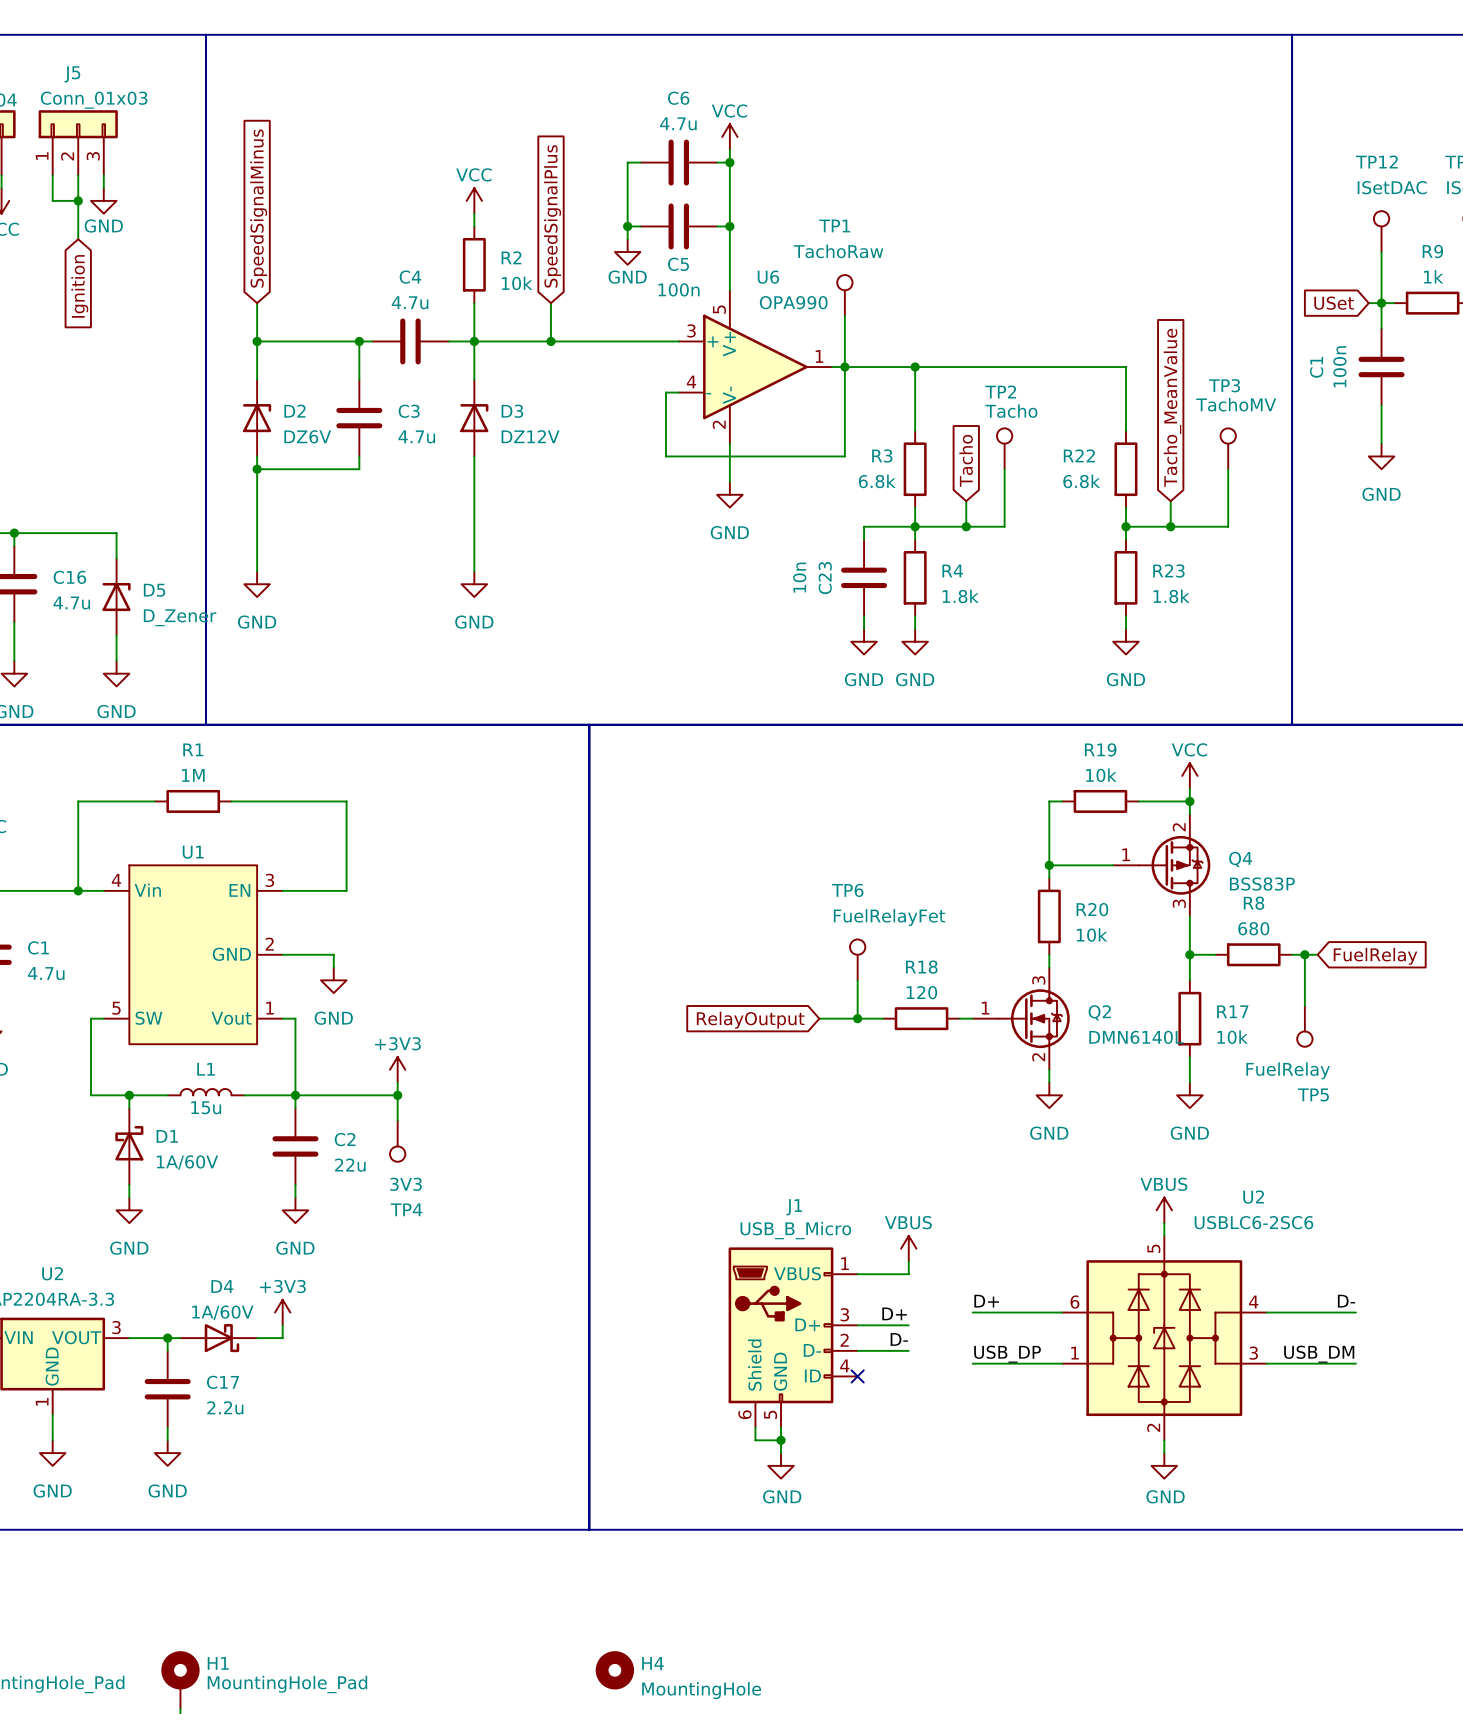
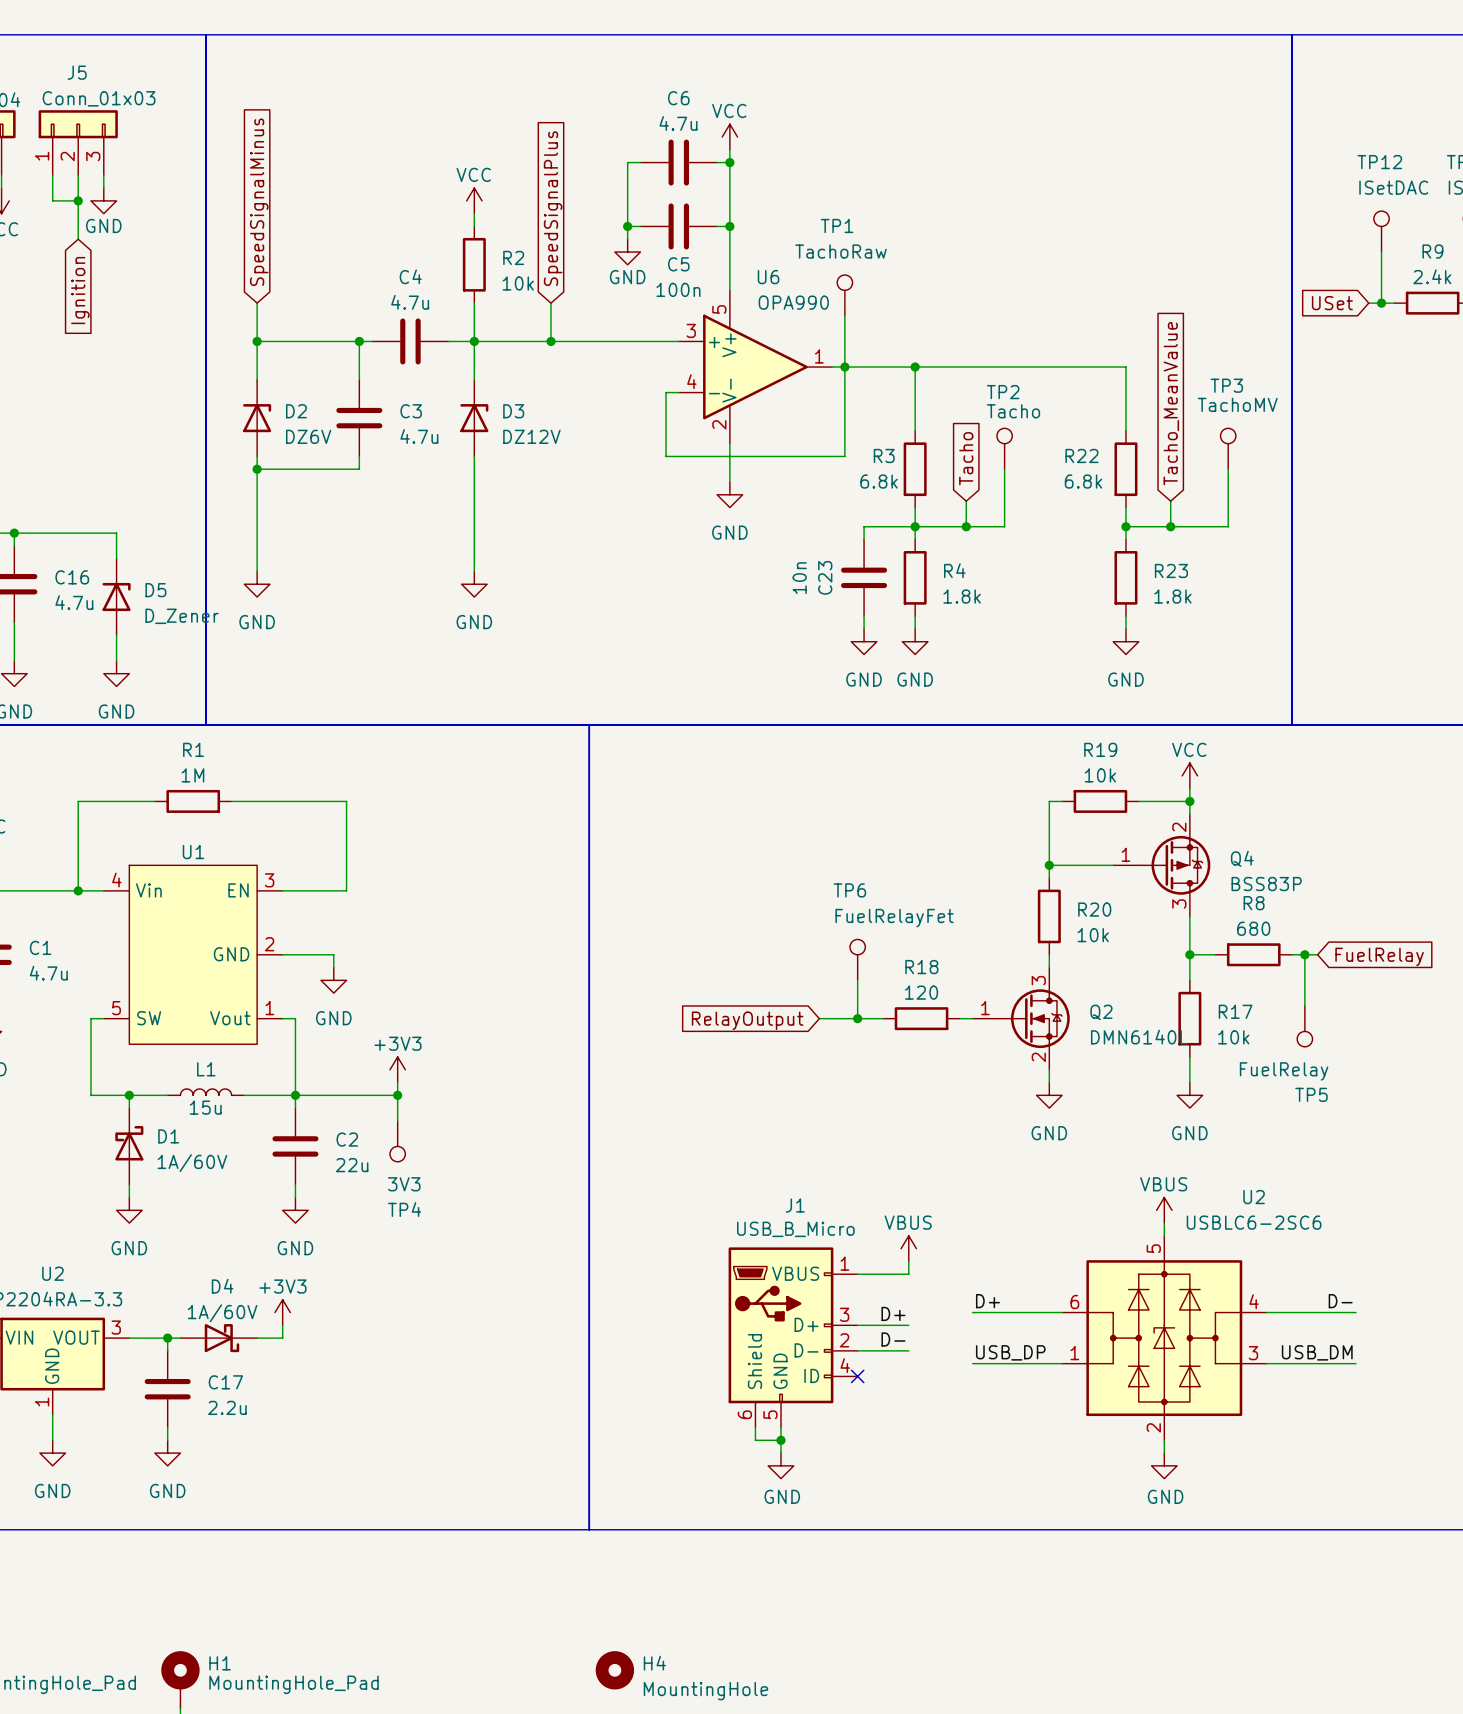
R9 value: 1k (1433, 276) -> 2.4k (1432, 276)
wire: (1381, 303) (1381, 328) -> none
C1: 100n (1381, 367) -> none
wire: (1381, 405) (1381, 443) -> none
power symbol: GND (1381, 456) -> none

